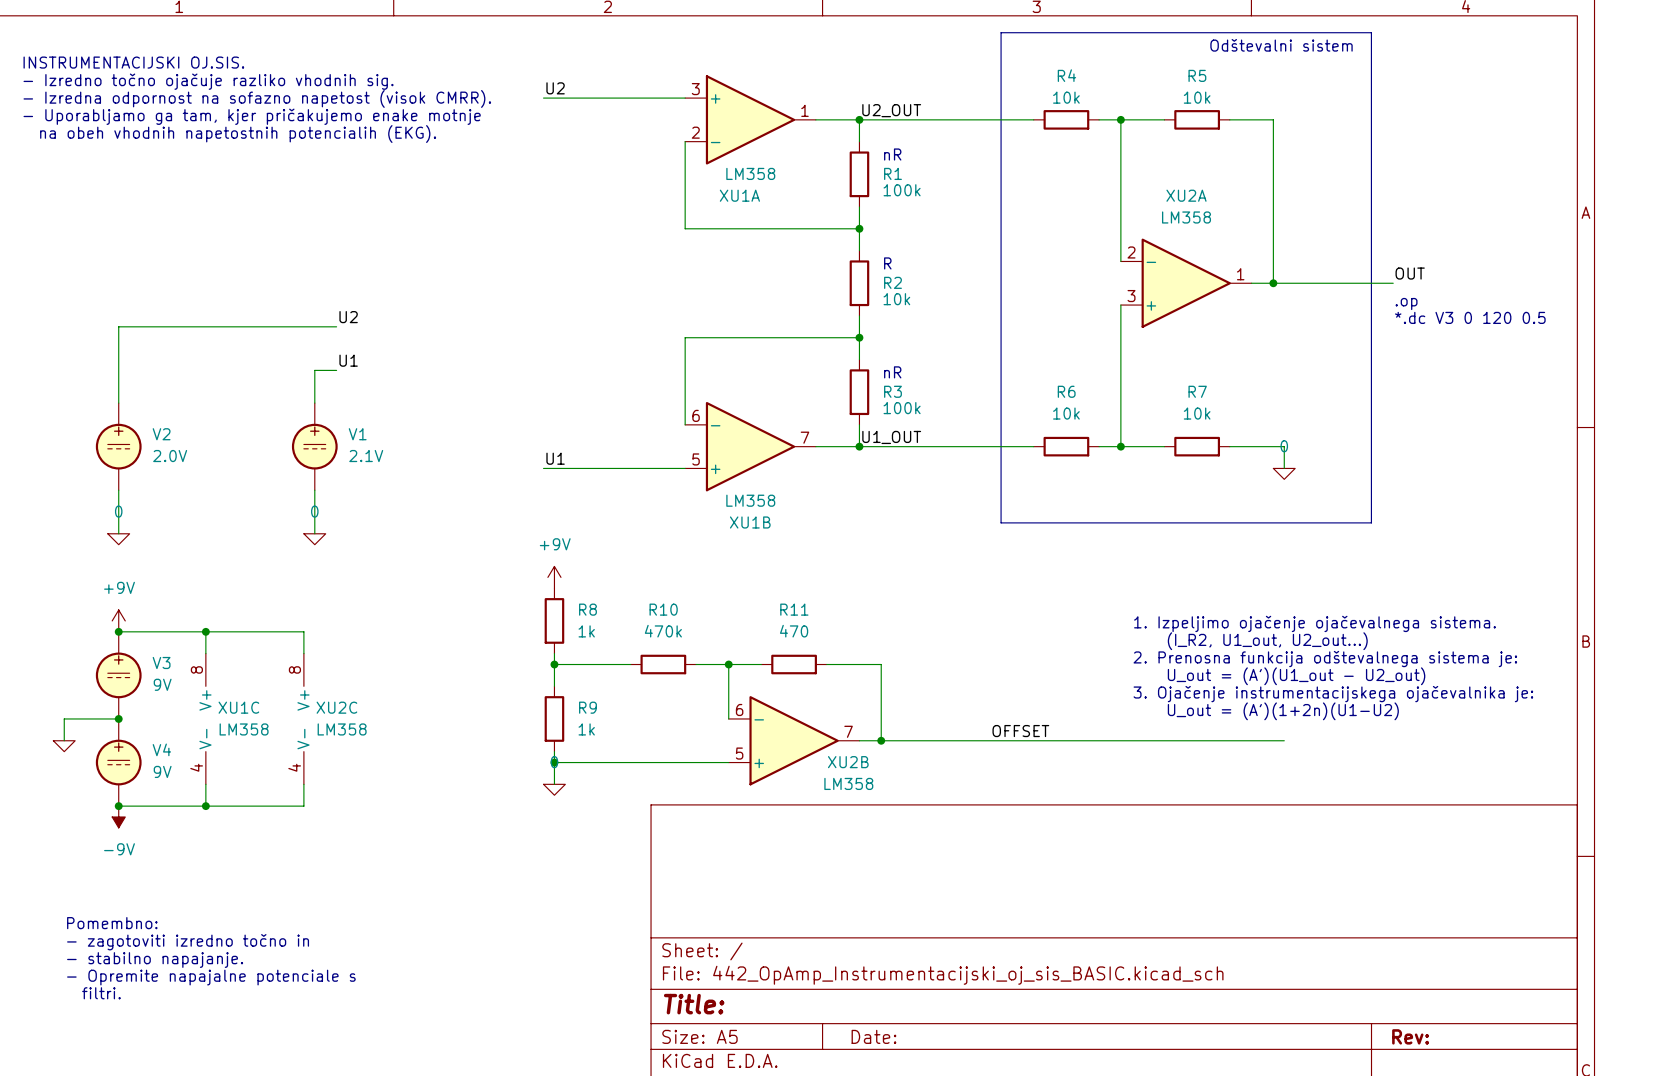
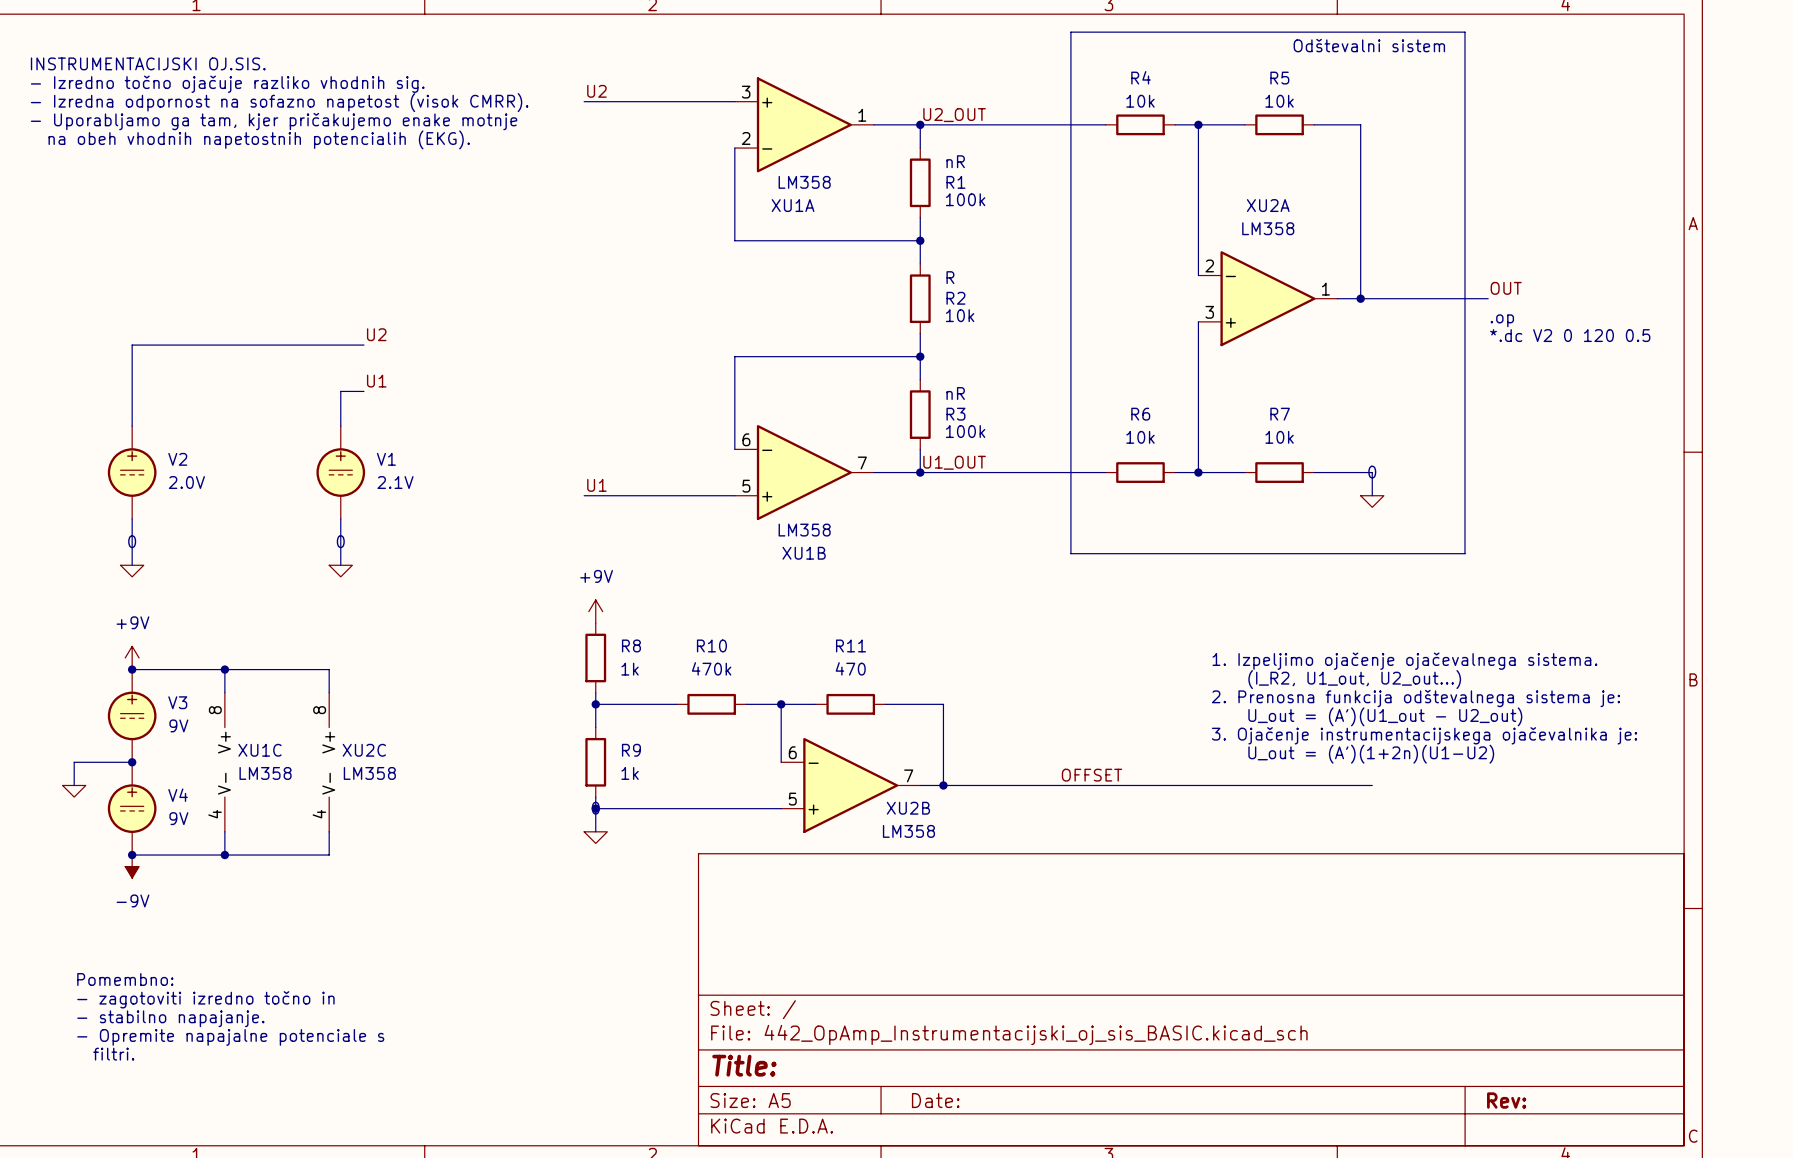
text: *.dc V3 0 120 0.5 (1470, 317) -> *.dc V2 0 120 0.5 (1570, 335)

